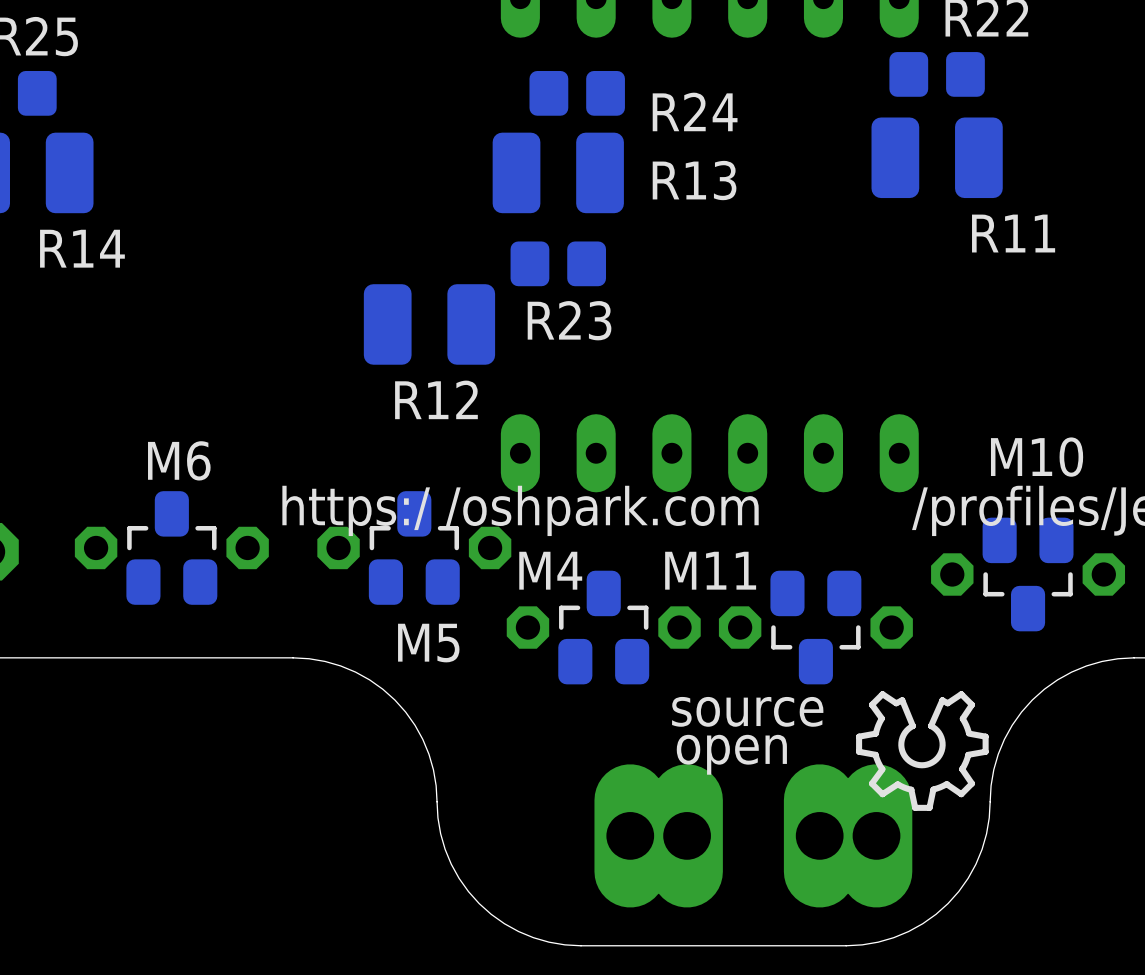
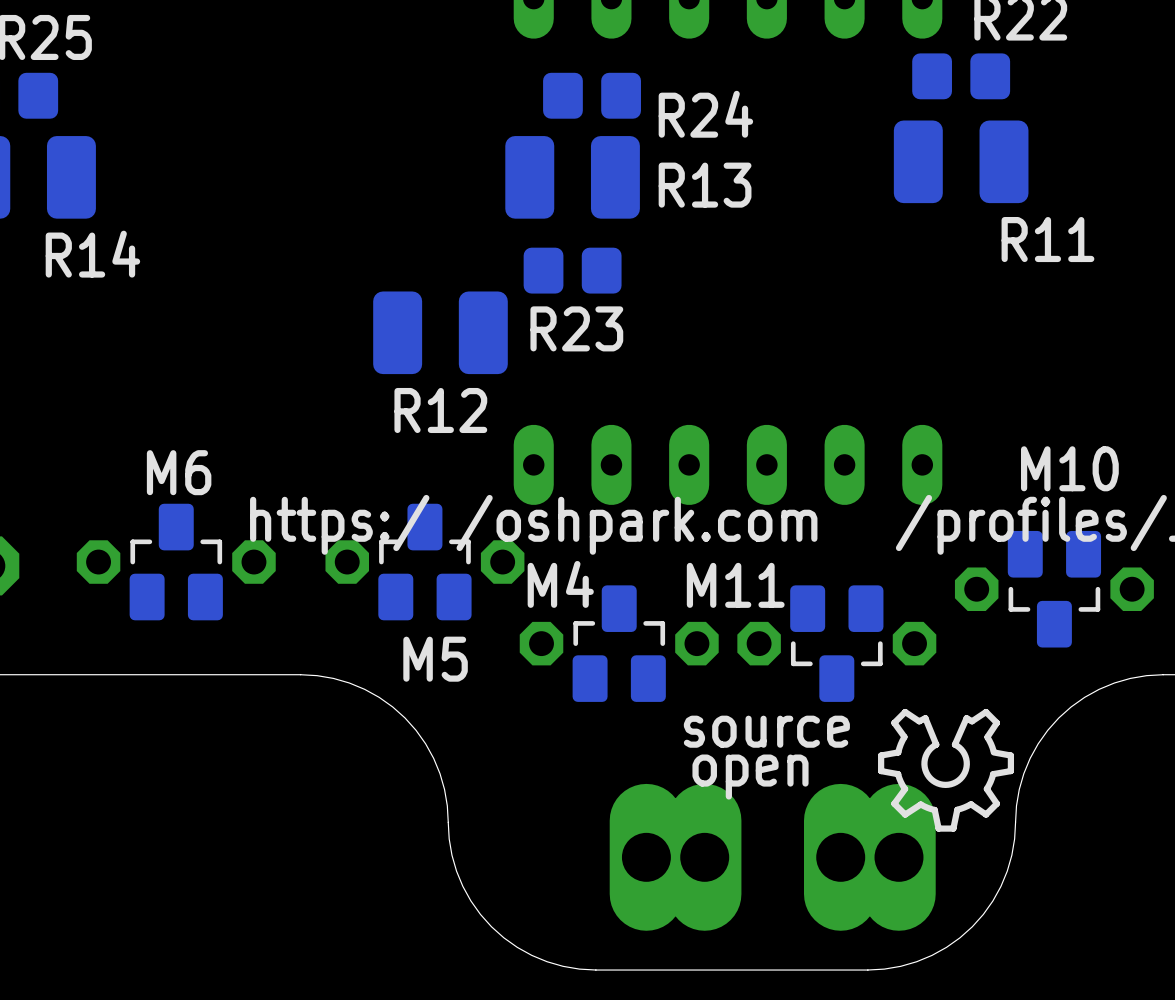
M6 footprint: [126, 491, 218, 605] -> [129, 503, 223, 621]
M5 footprint: [368, 491, 460, 605] -> [378, 503, 472, 621]
M10 footprint: [982, 517, 1074, 632] -> [1007, 530, 1102, 648]
M4 footprint: [558, 570, 650, 685] -> [572, 585, 666, 702]
M11 footprint: [770, 570, 862, 685] -> [790, 585, 884, 702]

